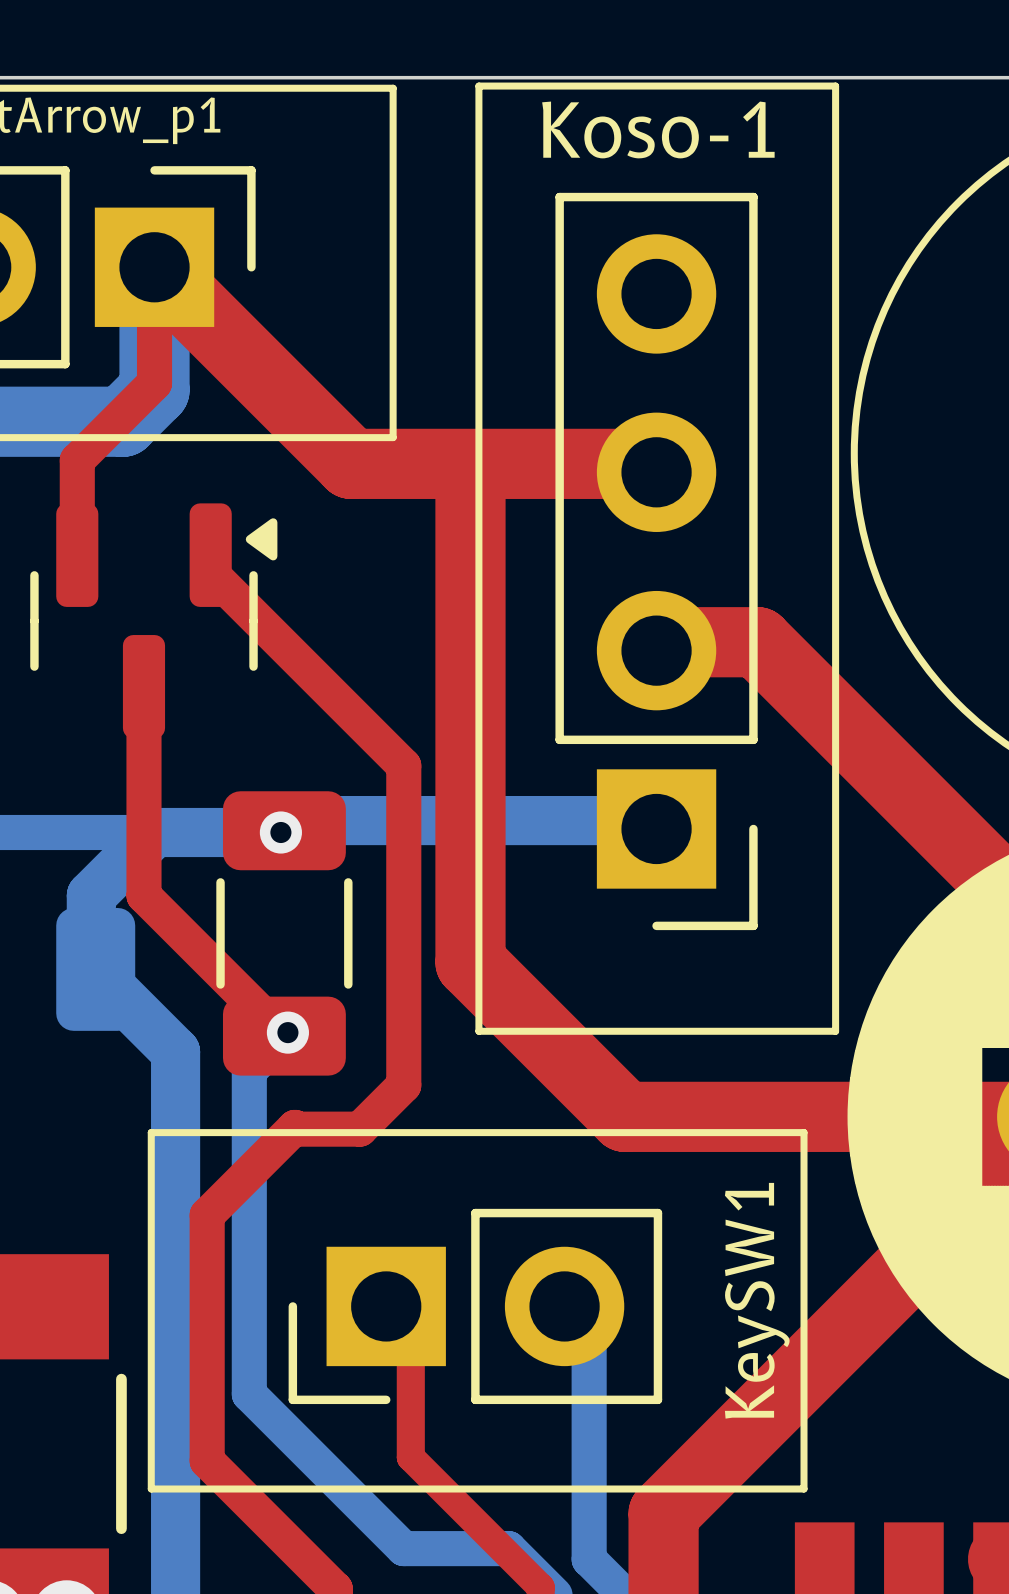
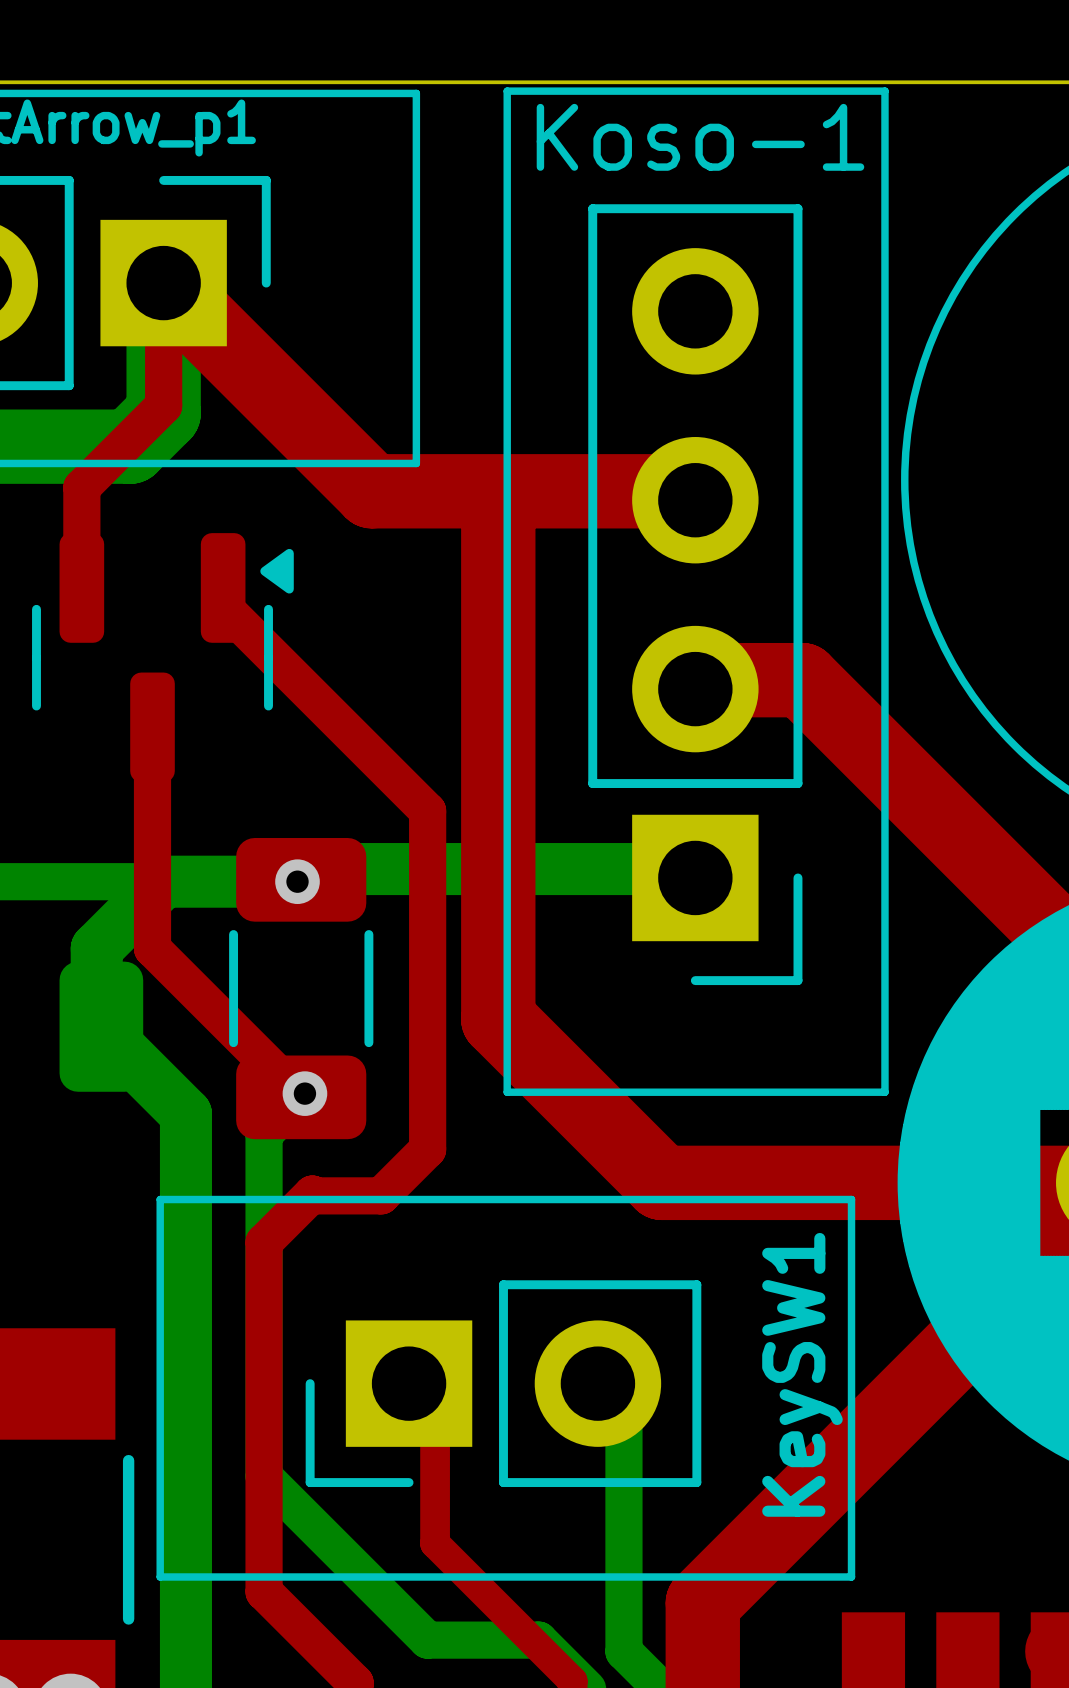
top track: (249, 1173) (207, 1215) (207, 1460) (249, 1503) -> (264, 1242) (264, 1591)

